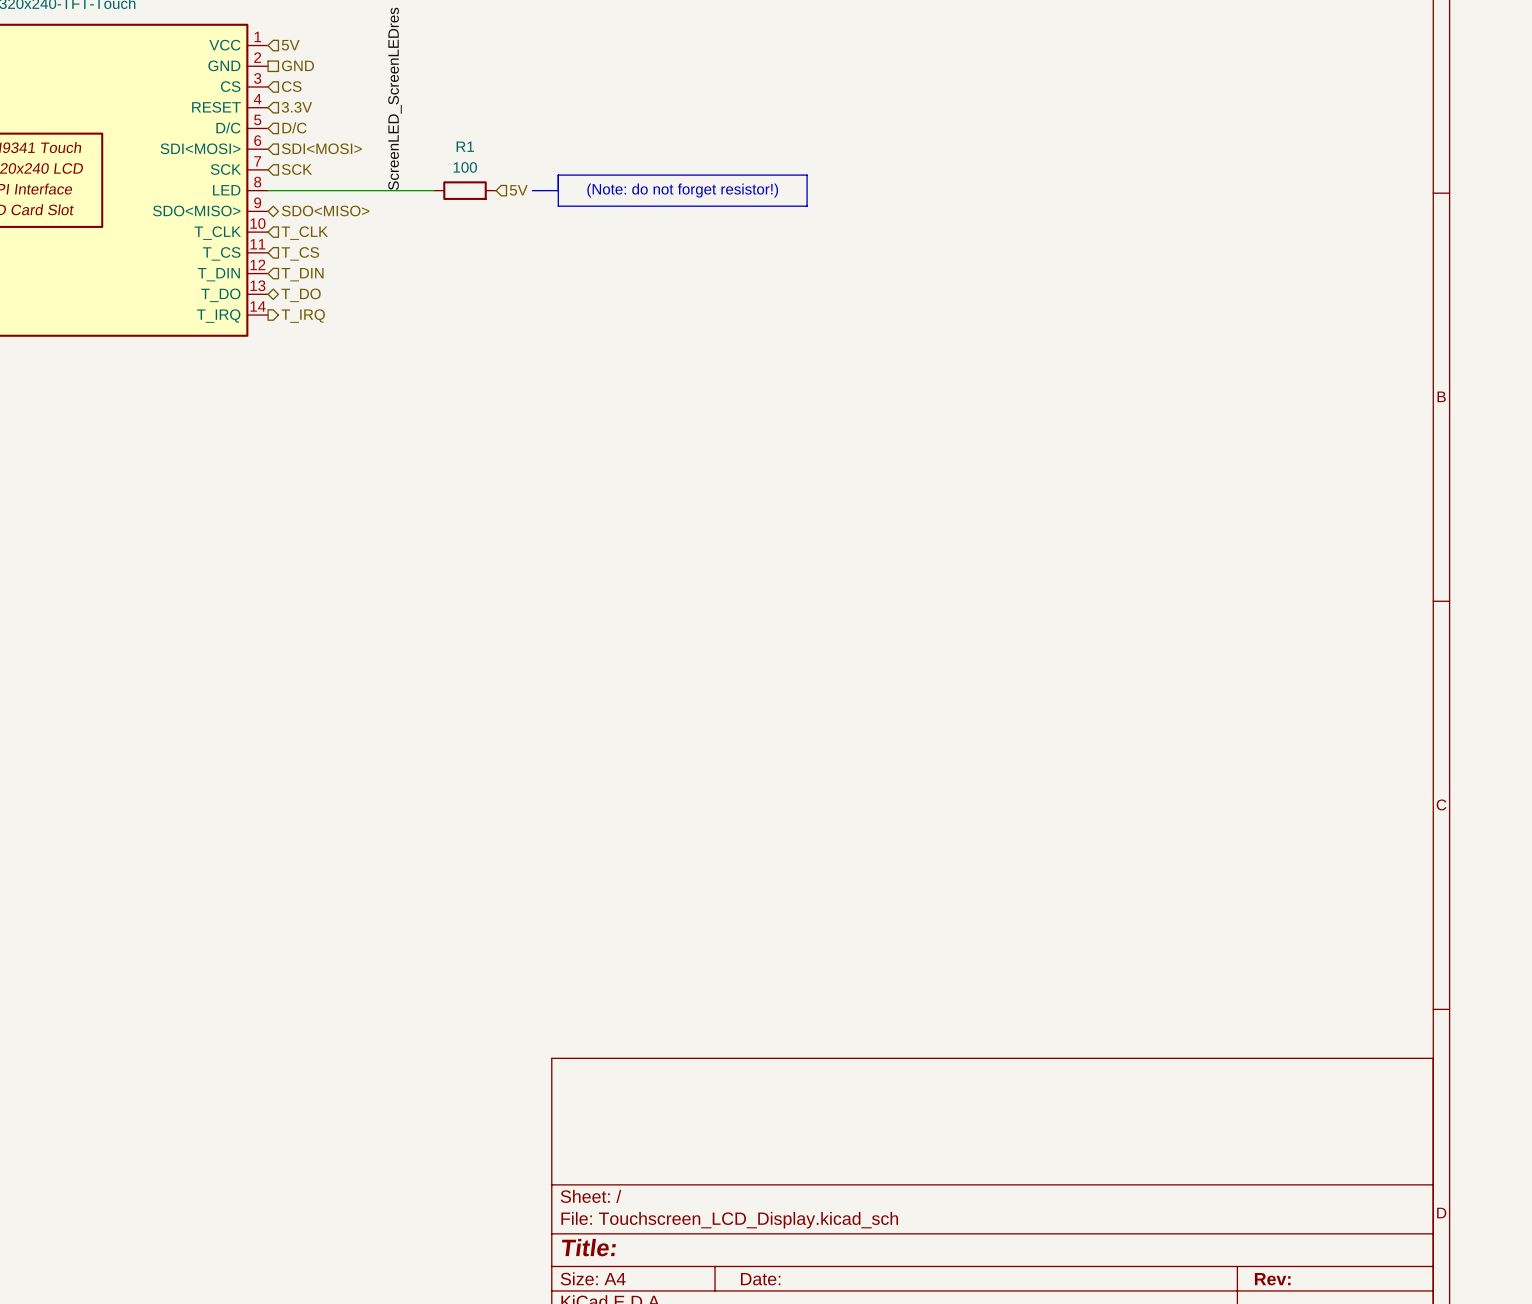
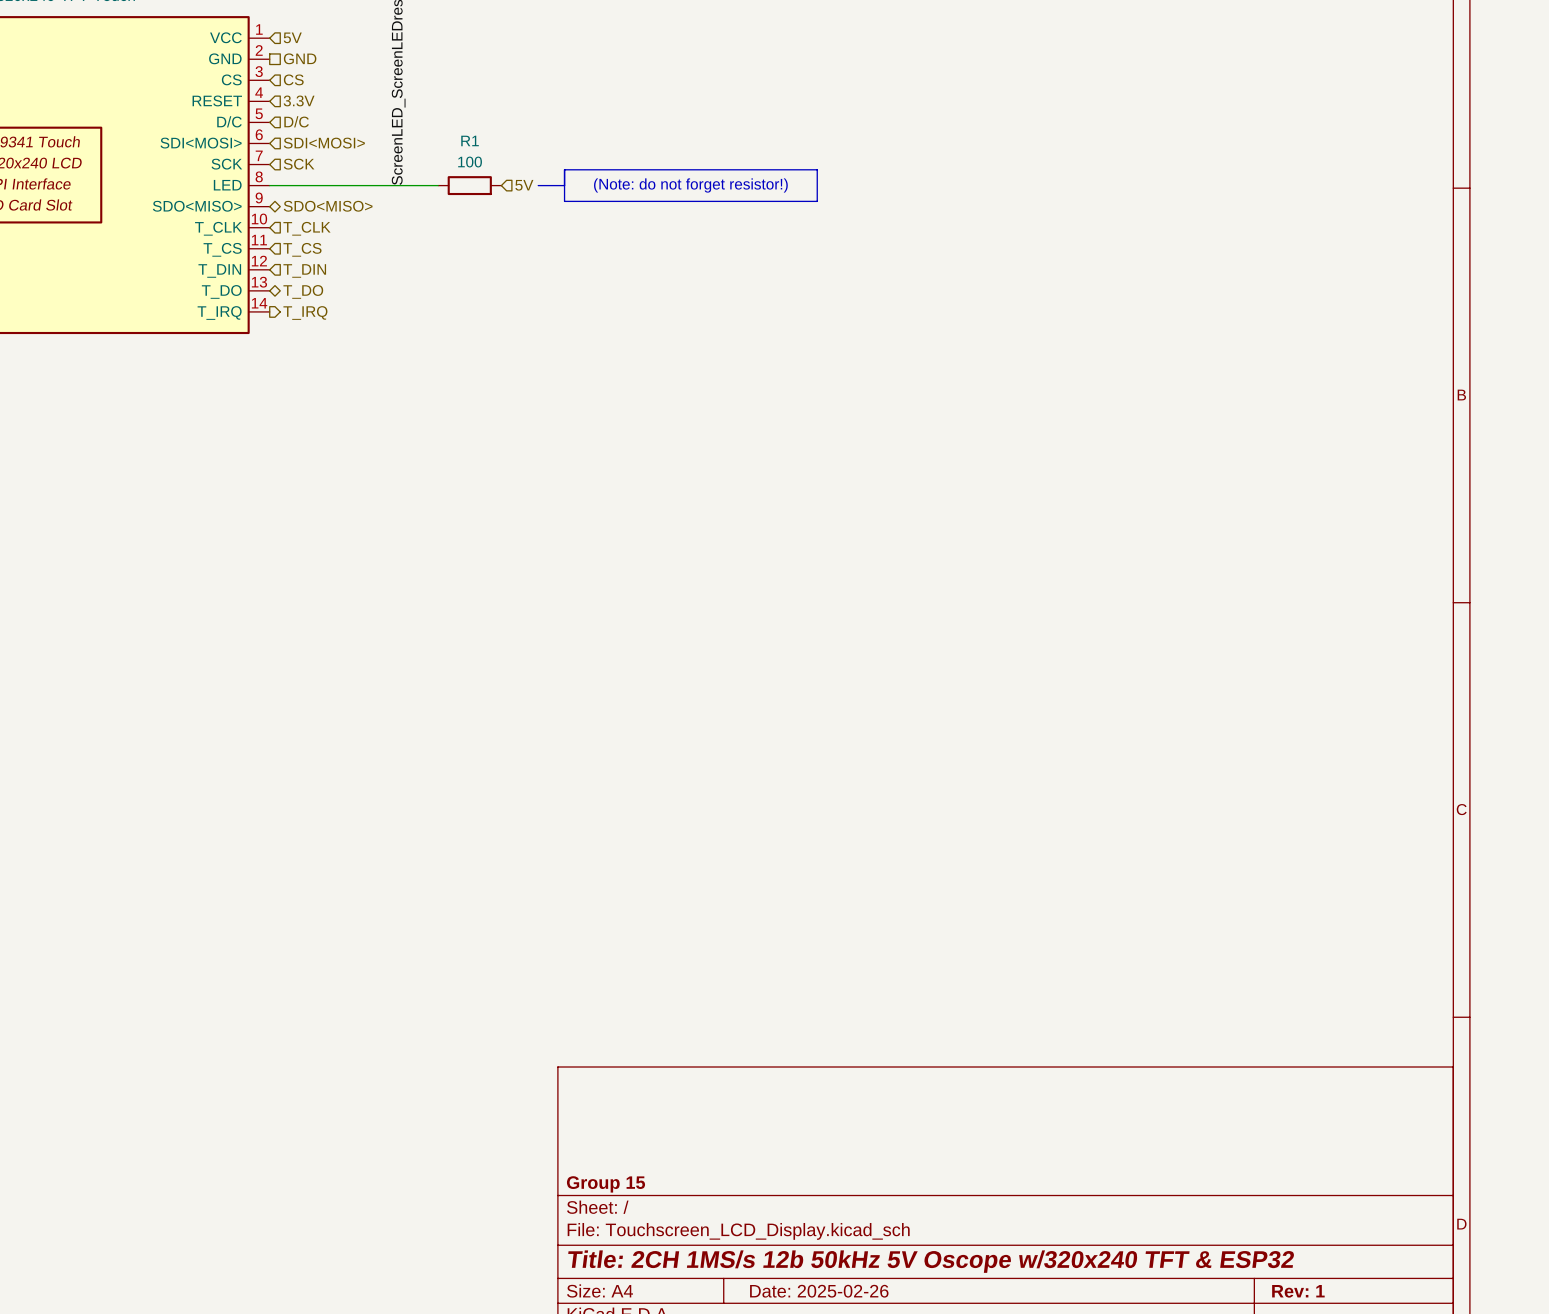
title block: none -> Group 15 (606, 1184)
title block: Title: (588, 1247) -> Title: 2CH 1MS/s 12b 50kHz 5V Oscope w/320x240 TFT & ESP32 (931, 1261)
title block: Date: (760, 1279) -> Date: 2025-02-26 (819, 1291)
title block: Rev: (1272, 1279) -> Rev: 1 (1298, 1291)

